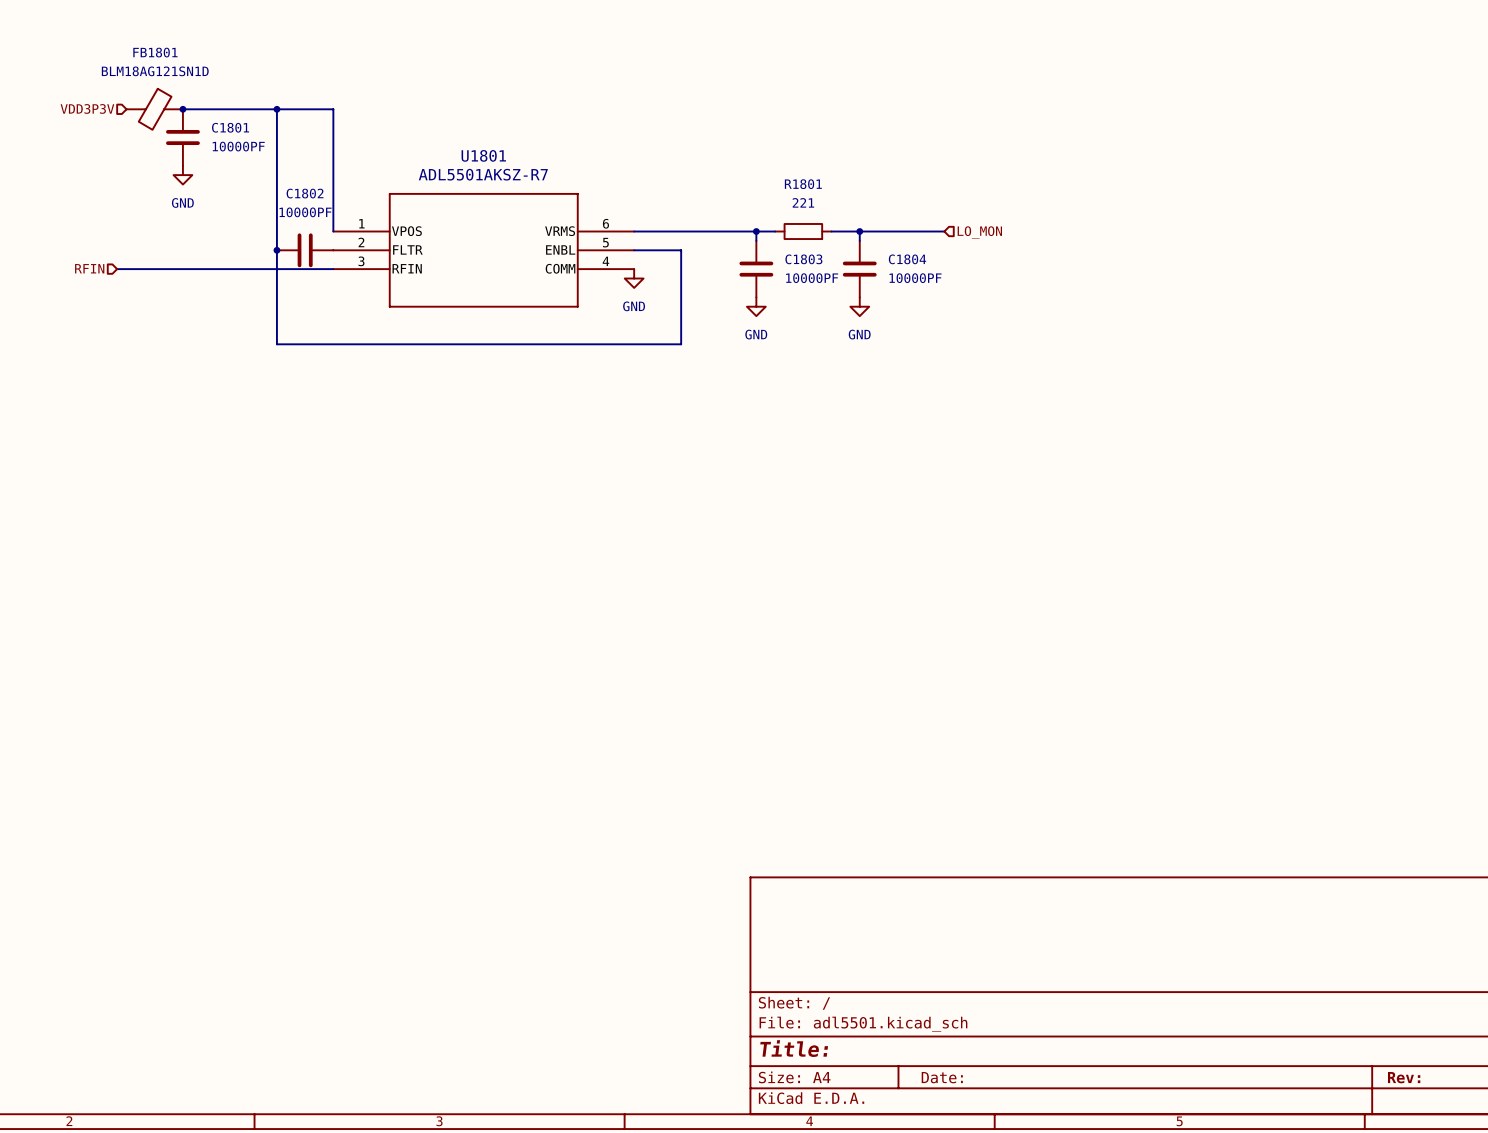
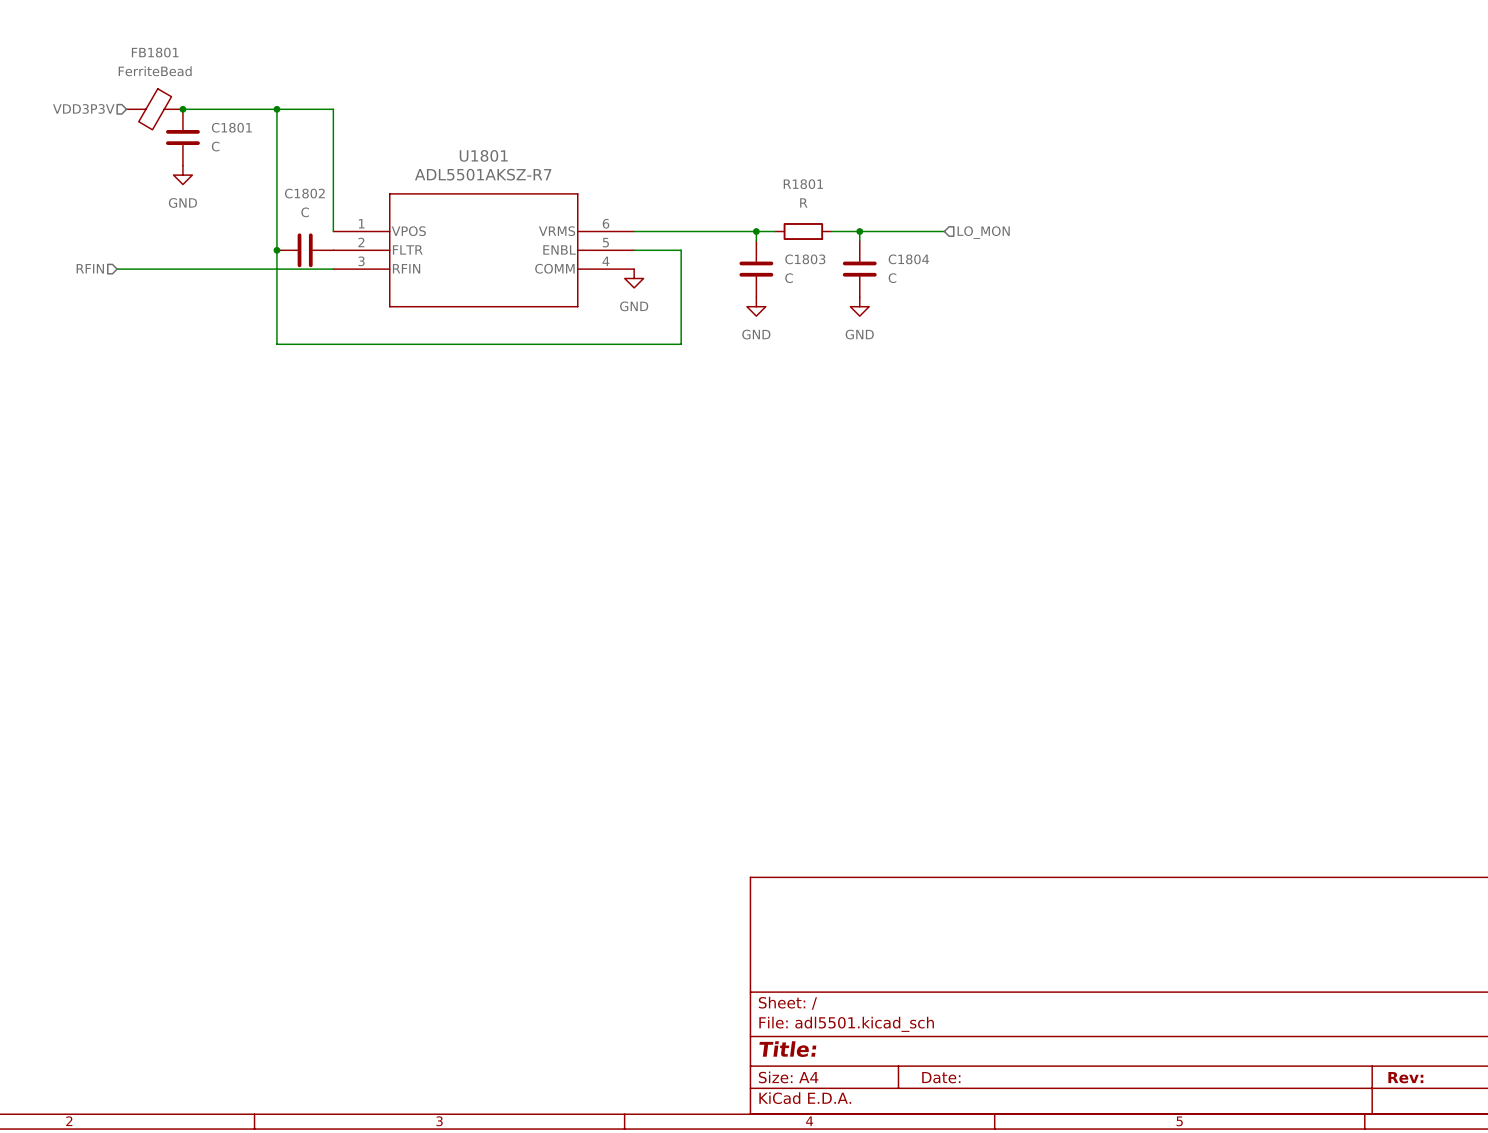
FB1801 value: BLM18AG121SN1D (155, 71) -> FerriteBead (155, 71)
C1801 value: 10000PF (238, 146) -> C (215, 146)
R1801 value: 221 (803, 202) -> R (803, 202)
C1802 value: 10000PF (305, 212) -> C (305, 212)
C1803 value: 10000PF (812, 278) -> C (789, 278)
C1804 value: 10000PF (915, 278) -> C (892, 278)

